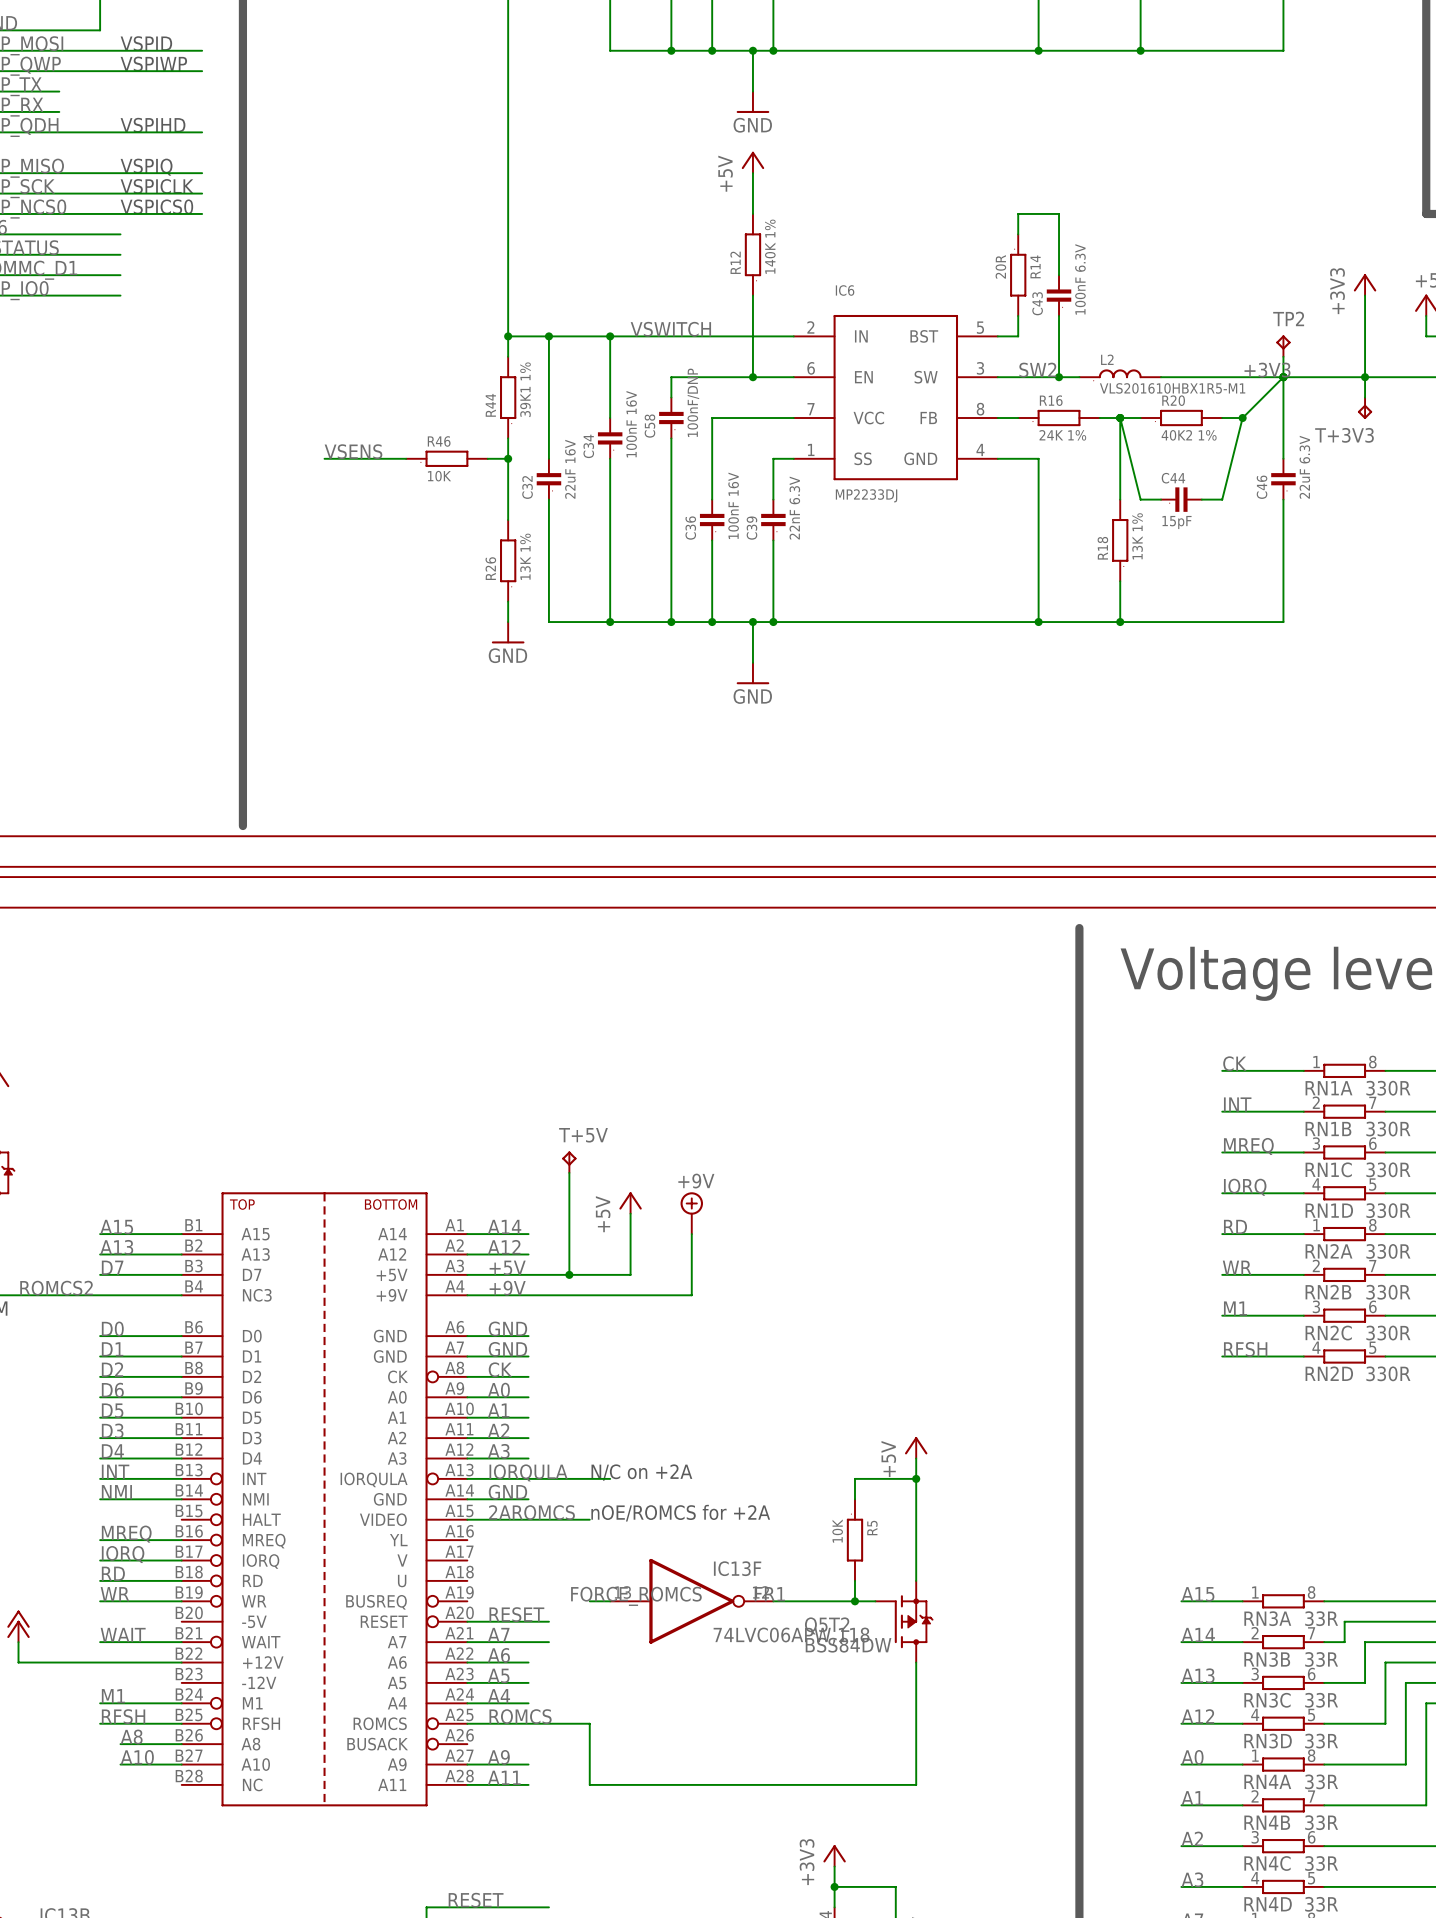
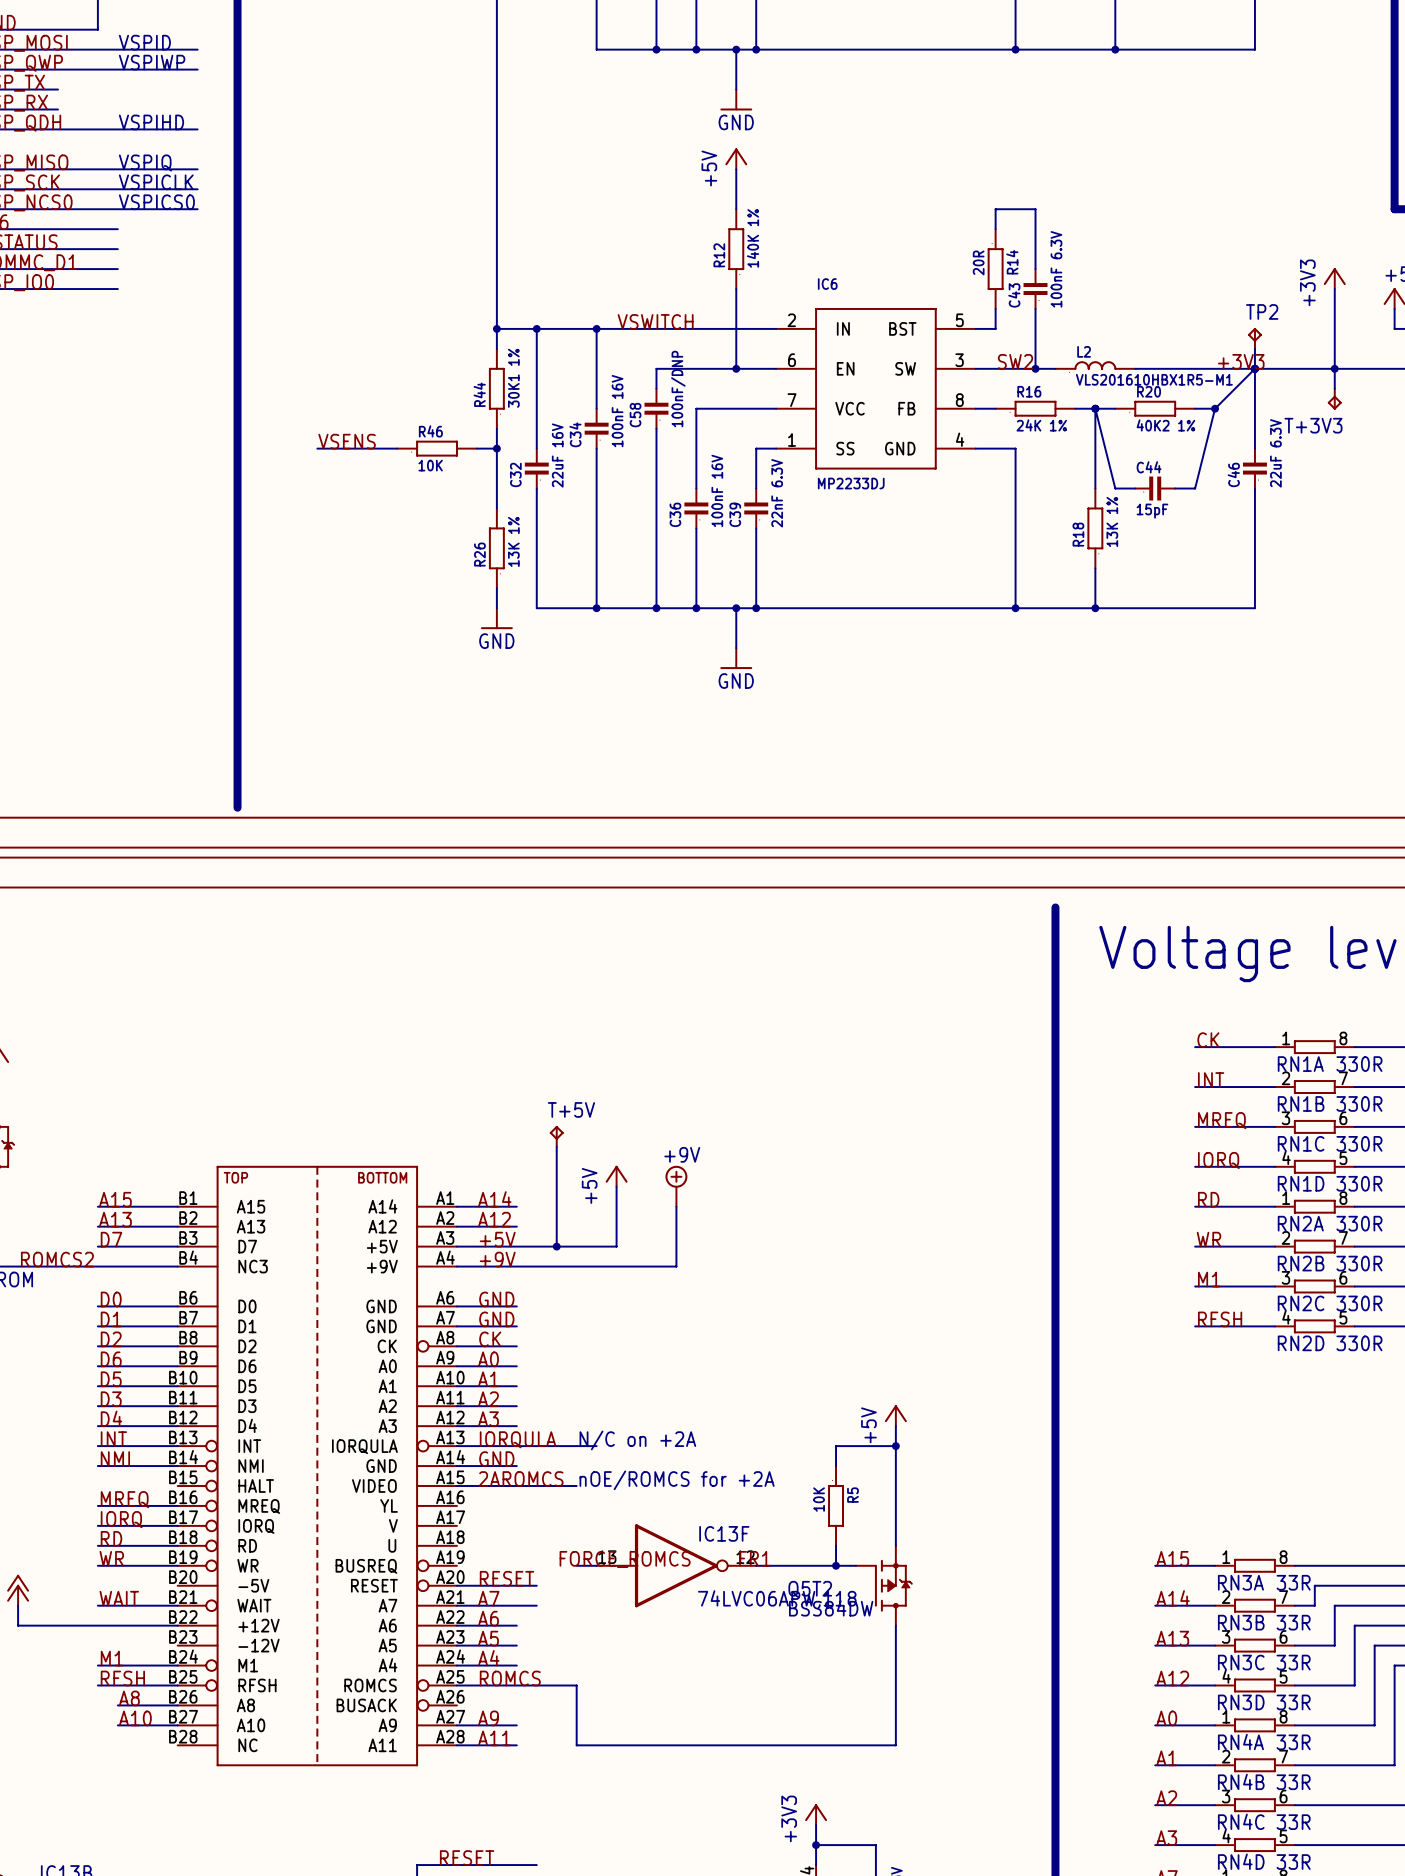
R44 value: 39K1 1% (525, 389) -> 30K1 1% (513, 378)

